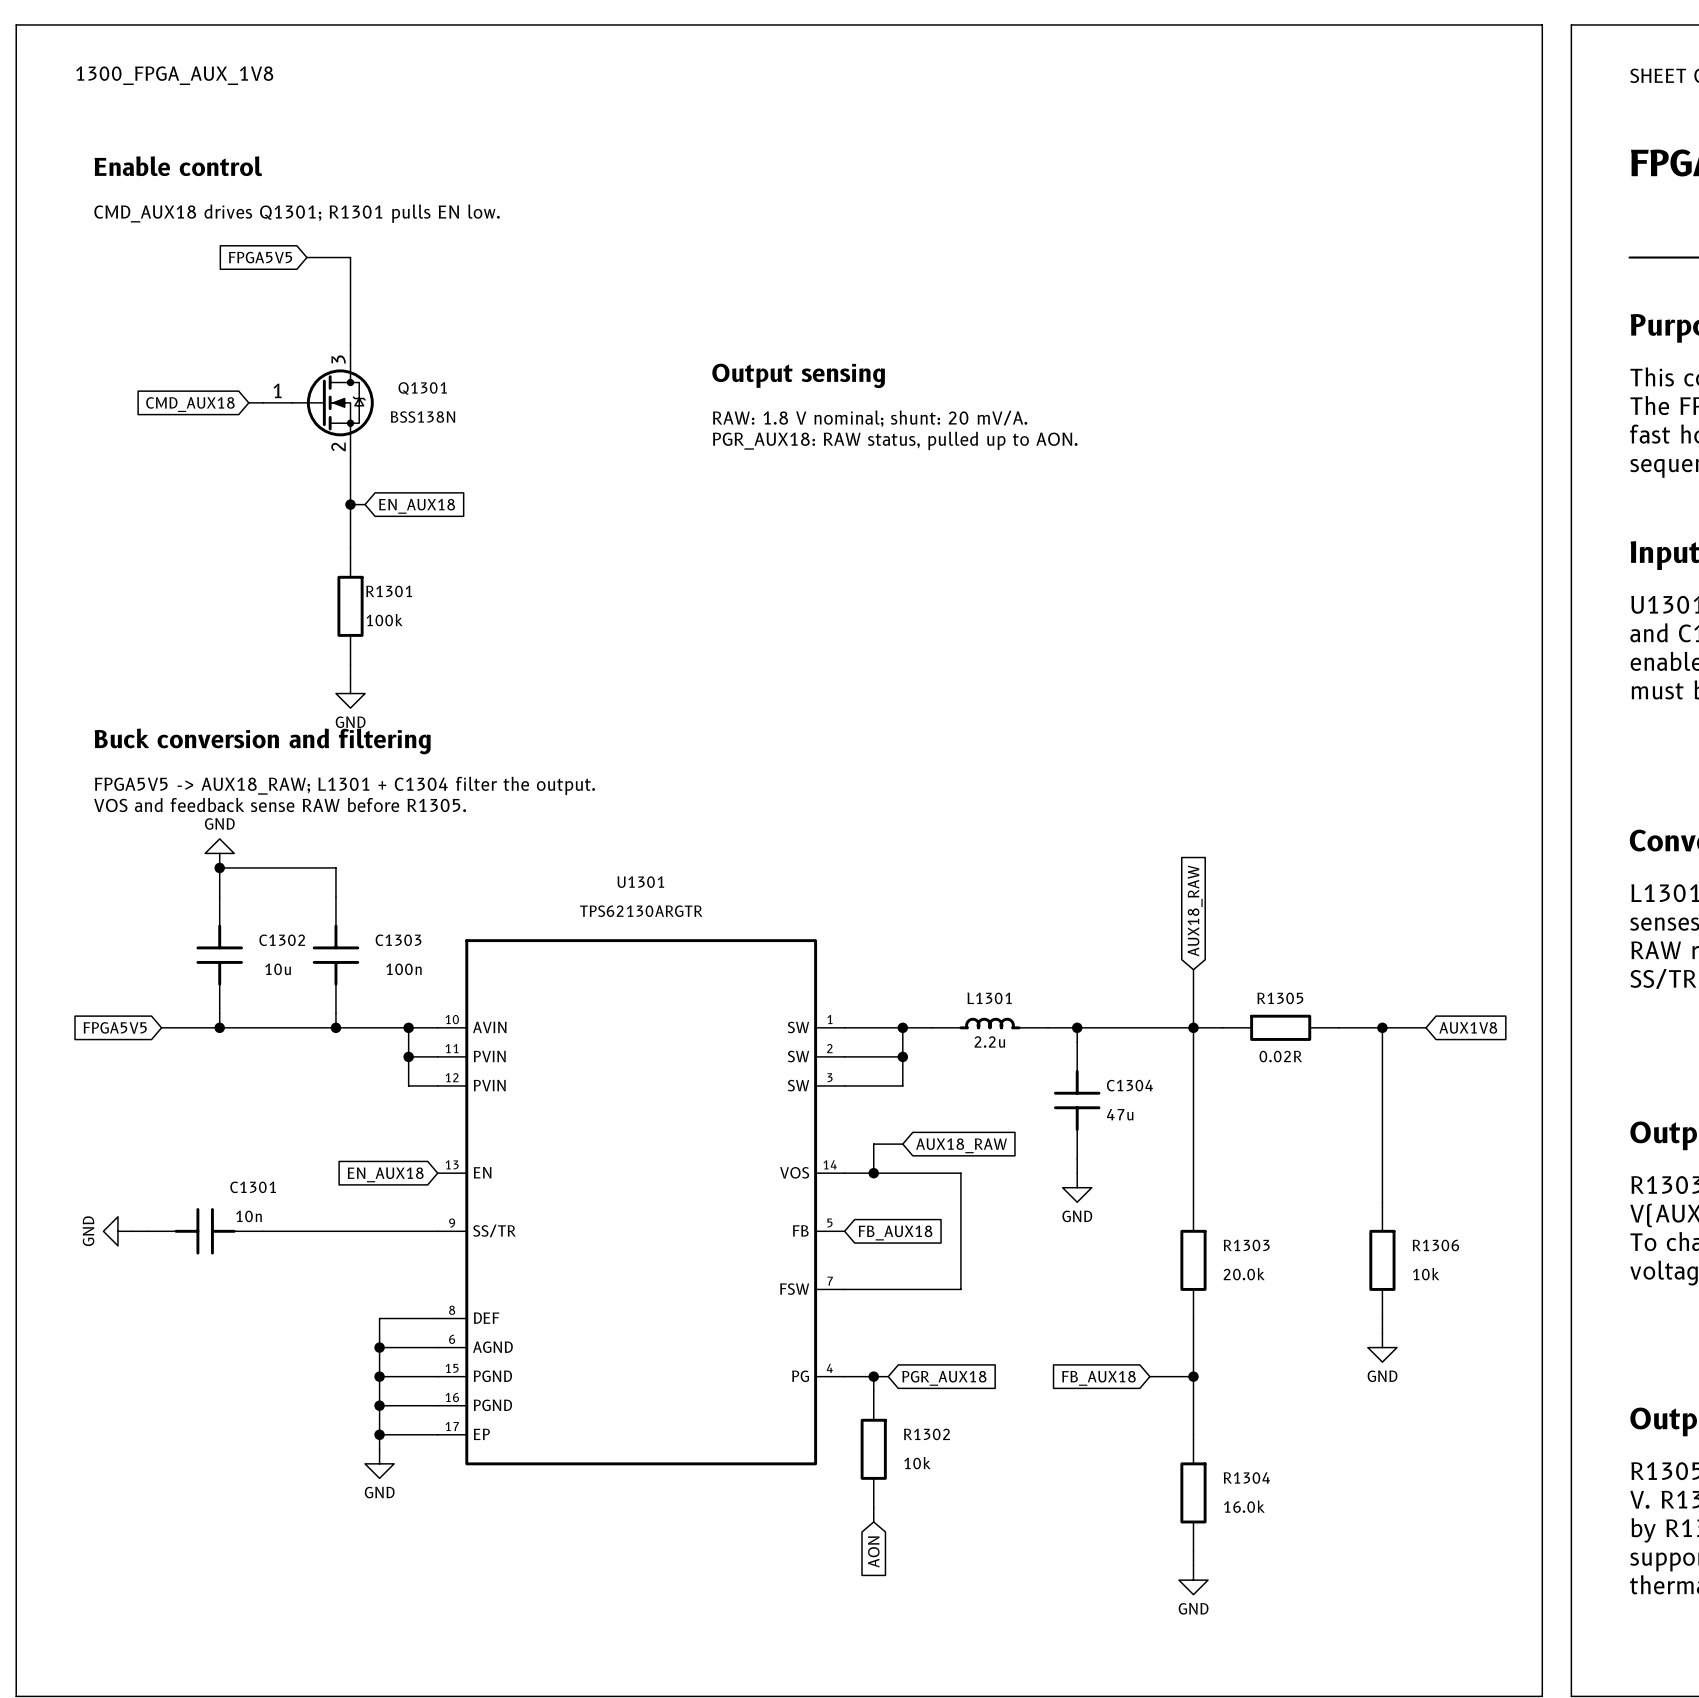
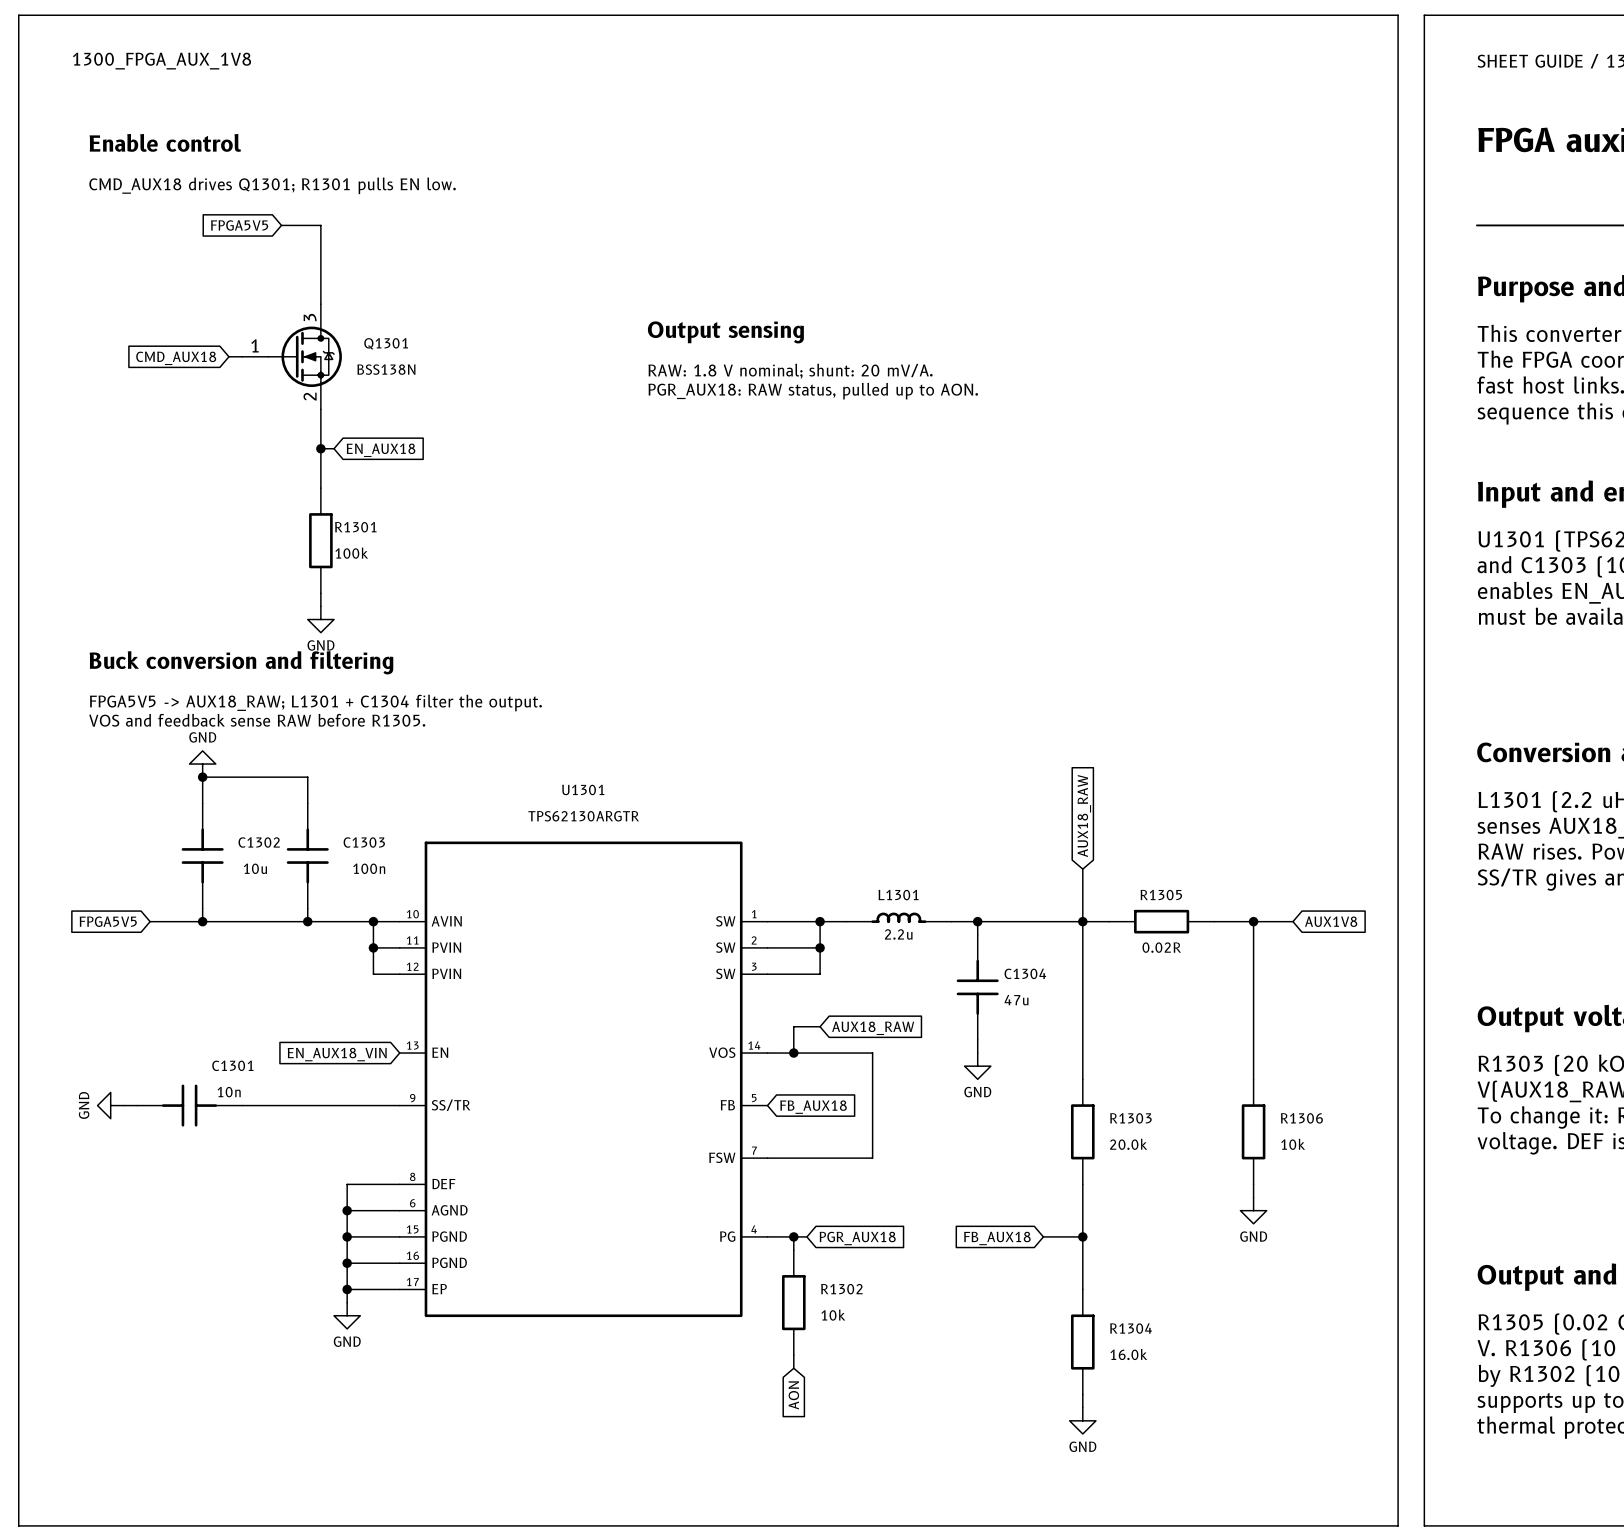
global label: EN_AUX18 (385, 1174) -> EN_AUX18_VIN (337, 1054)

